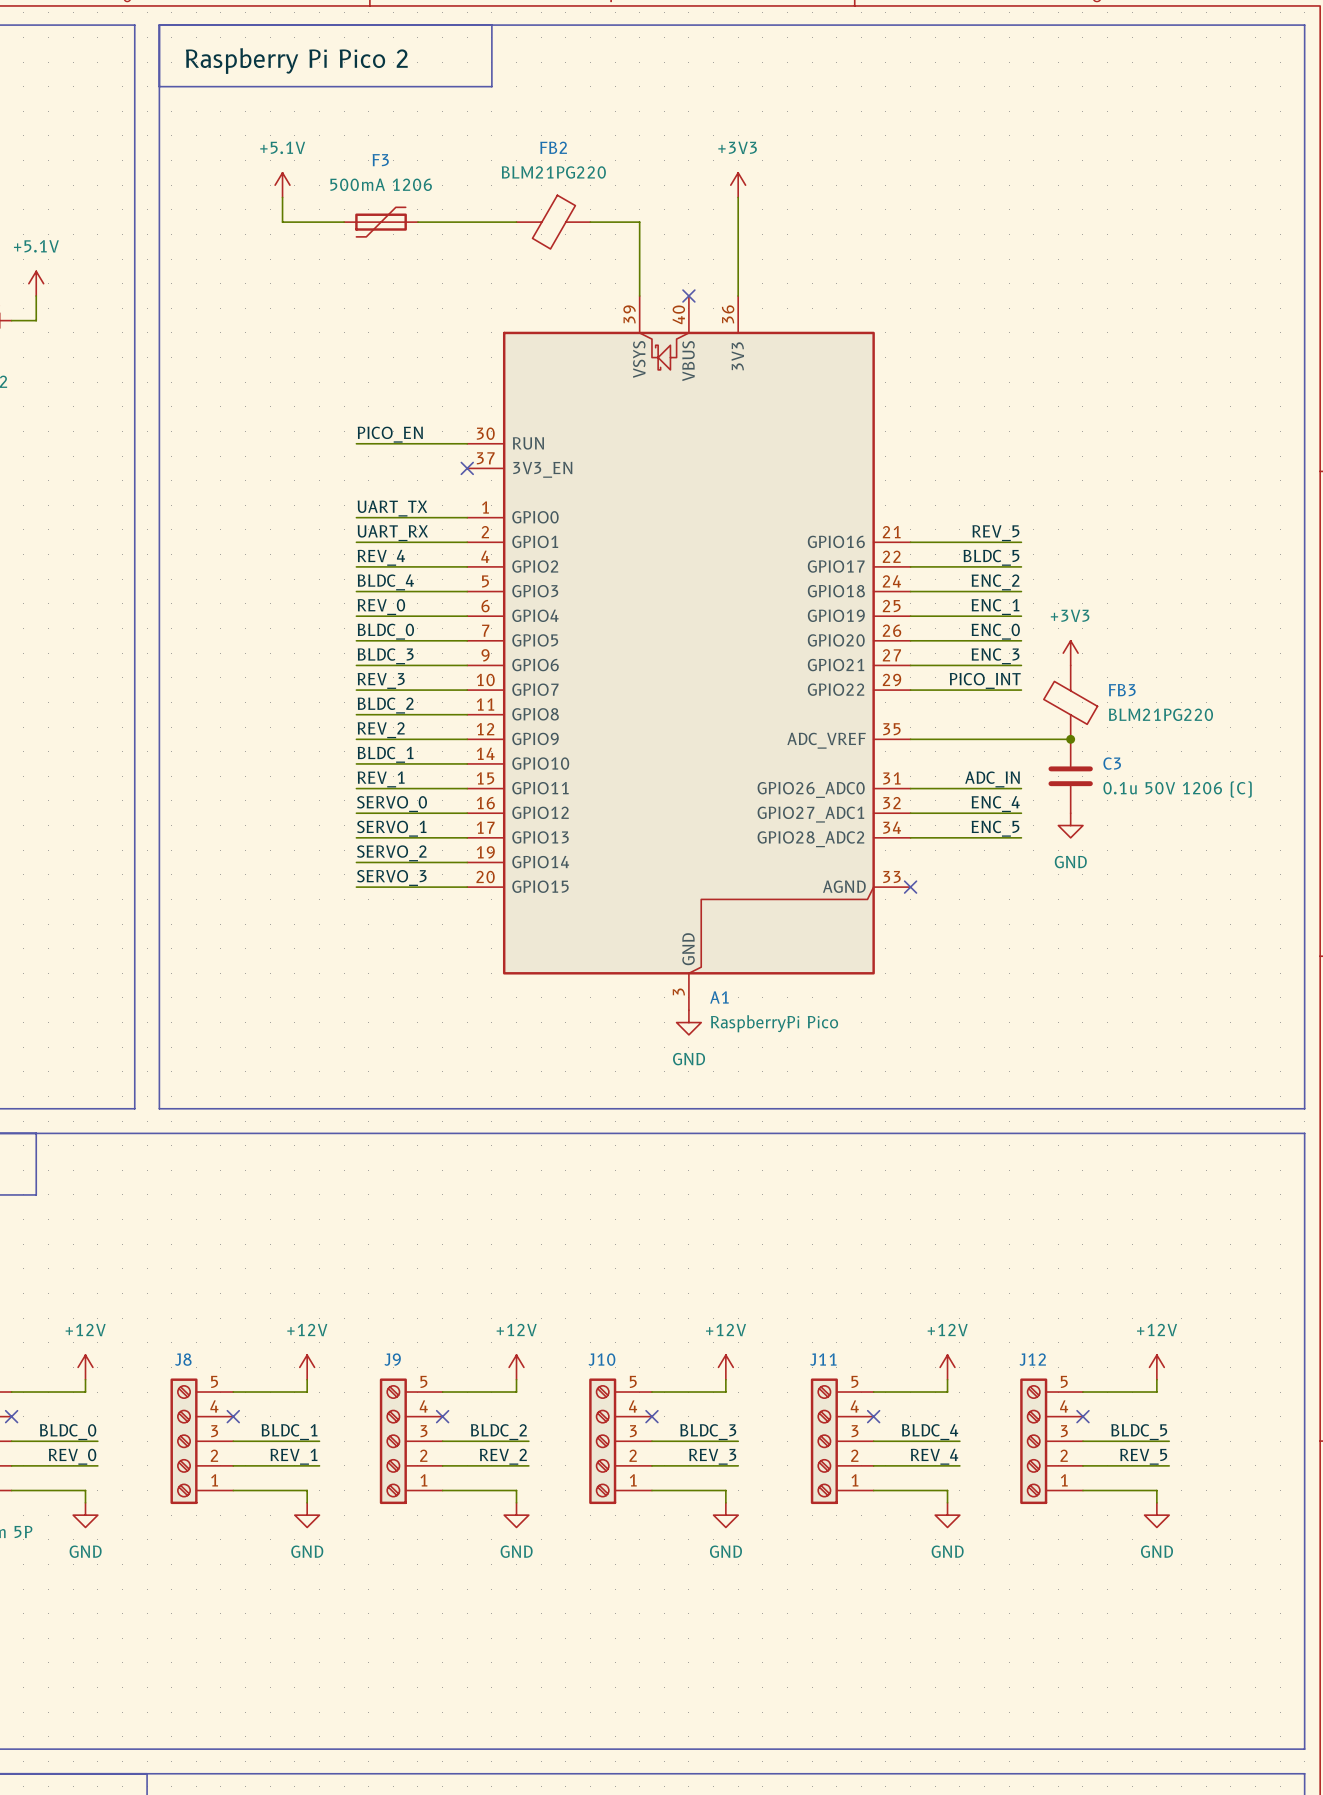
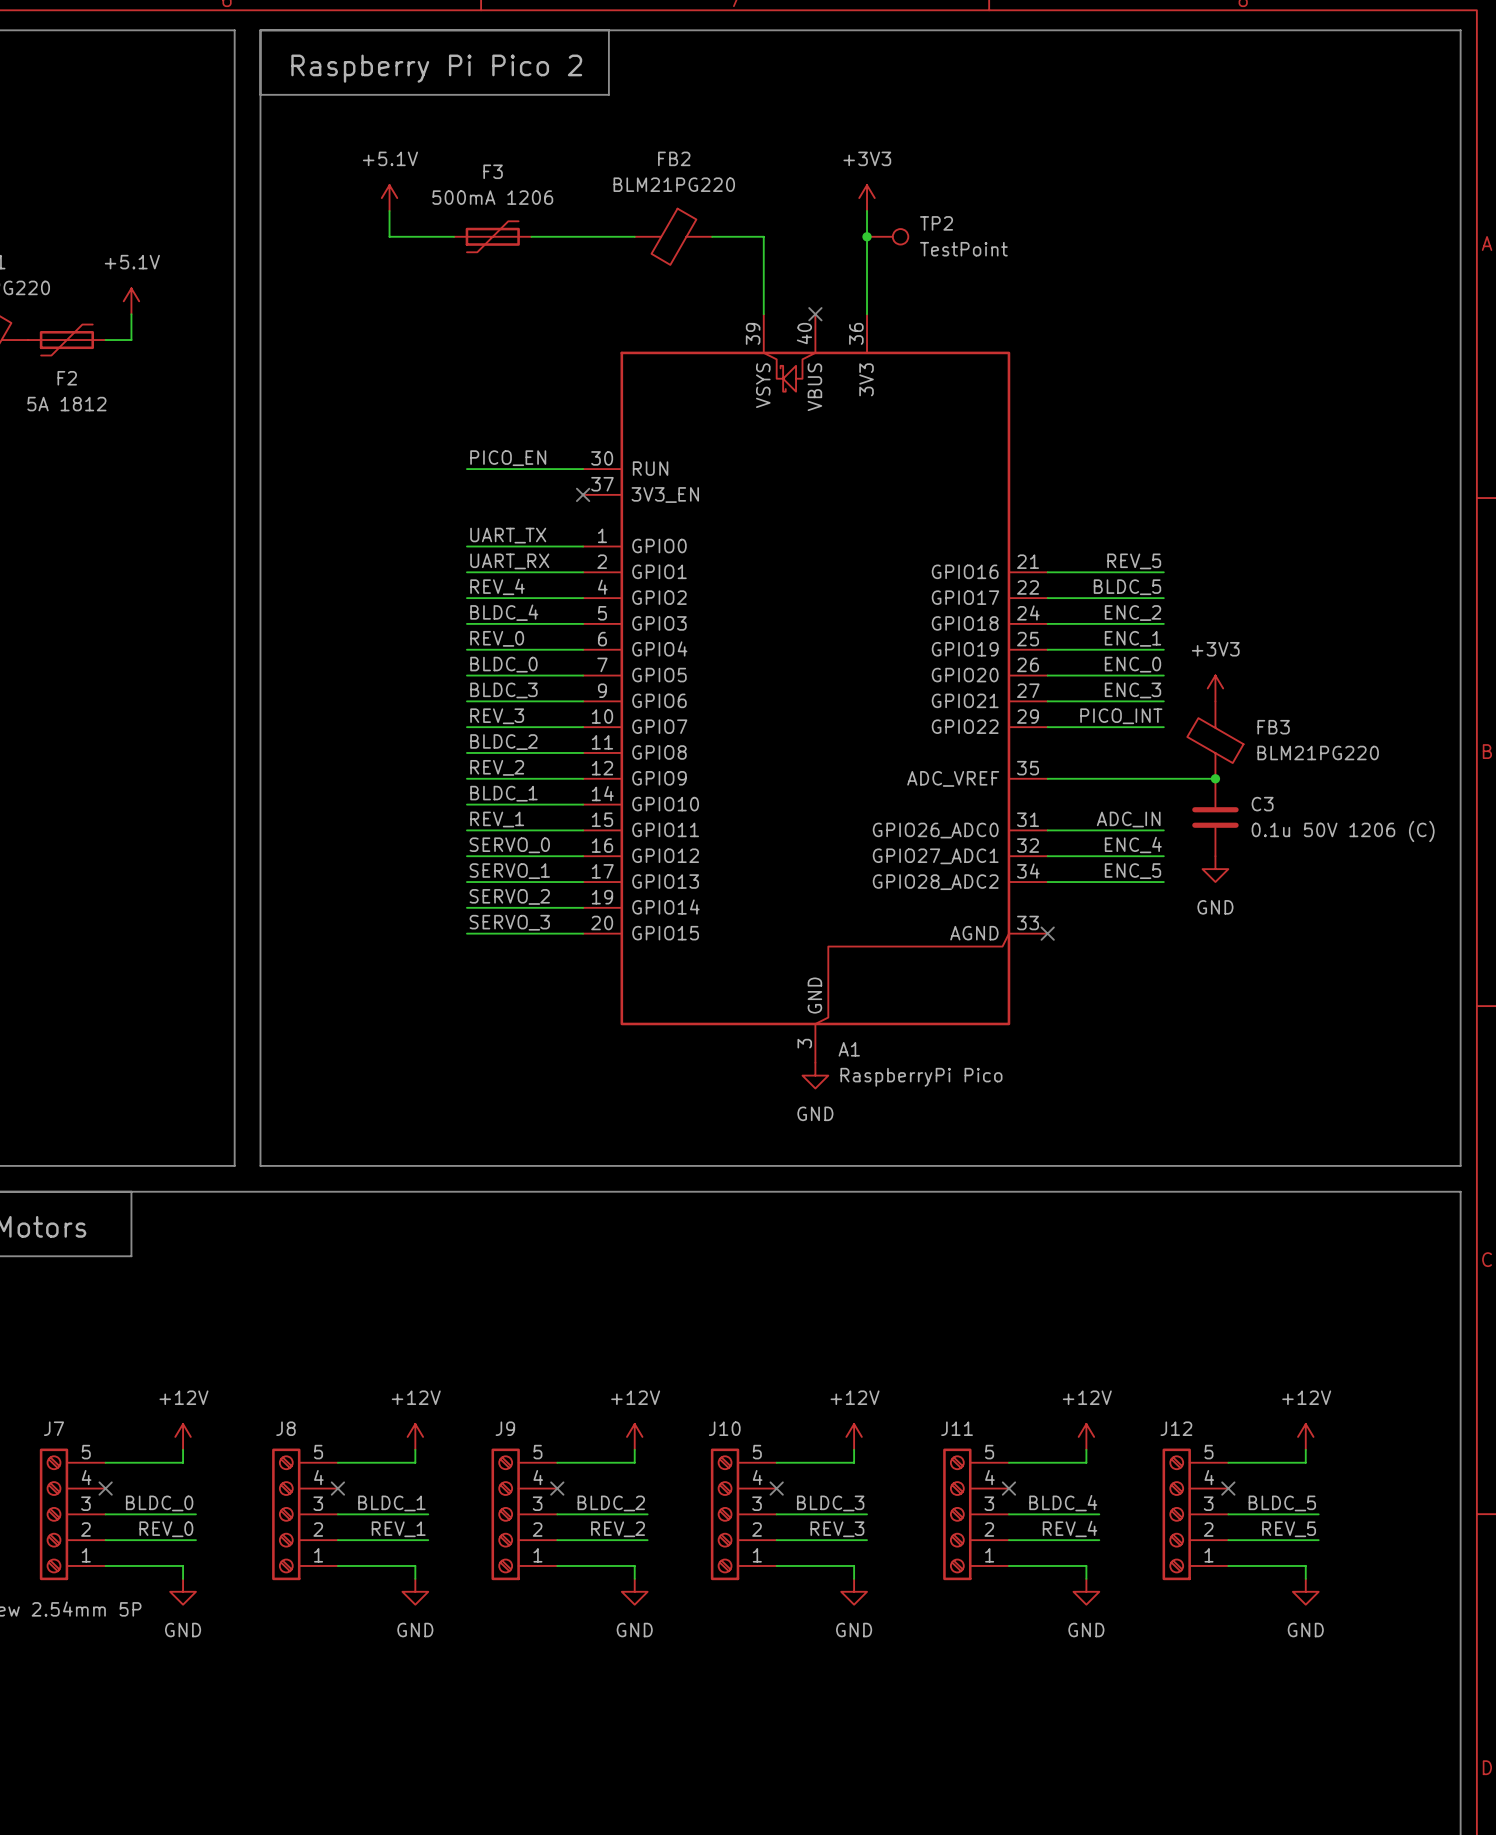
junction: none -> (867, 236)
TP2: none -> TestPoint (887, 236)

